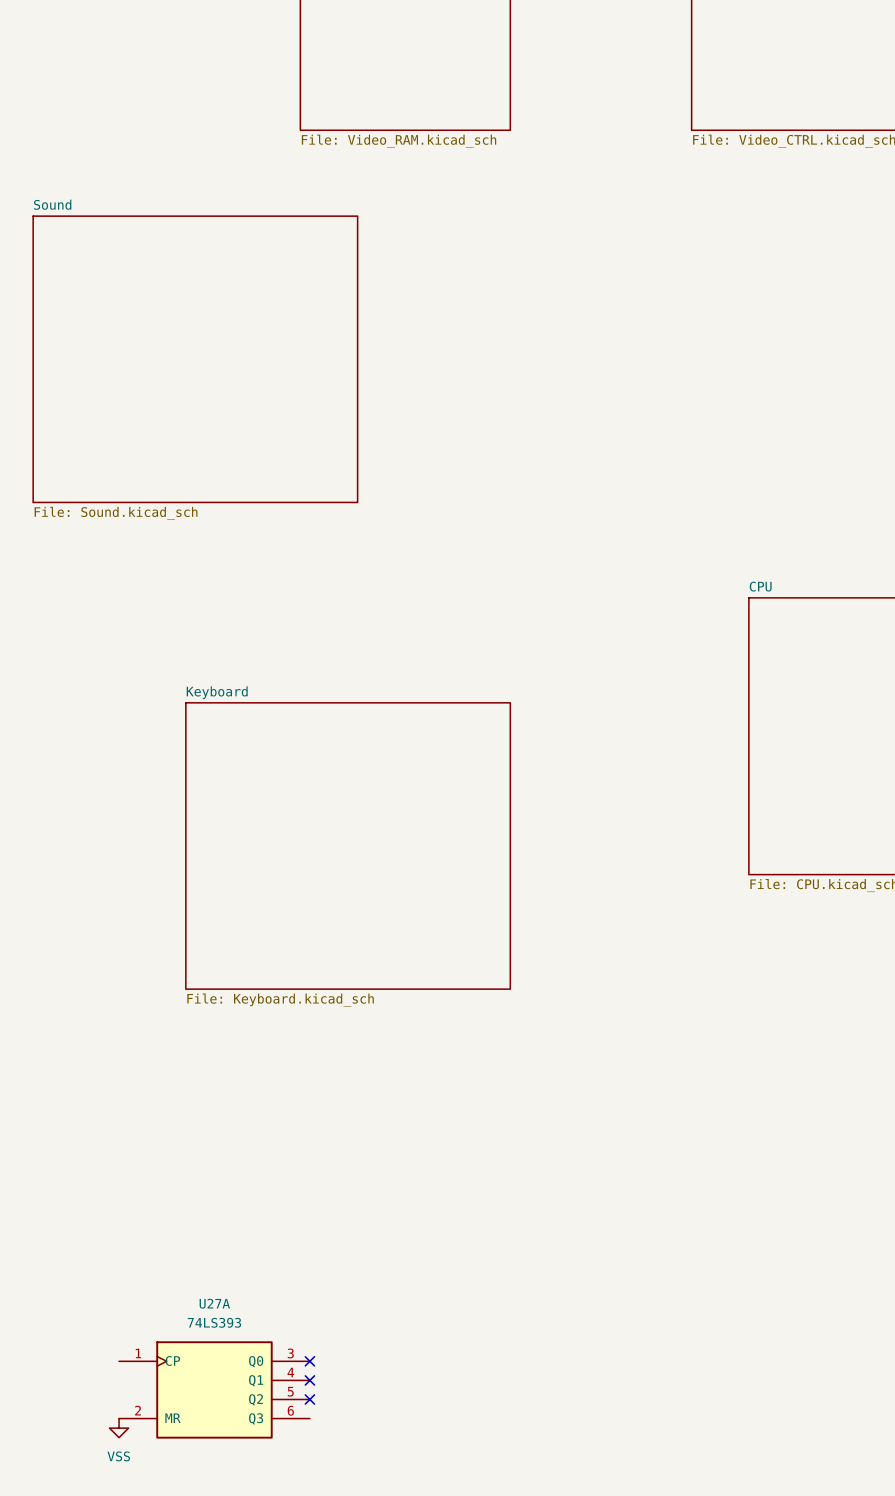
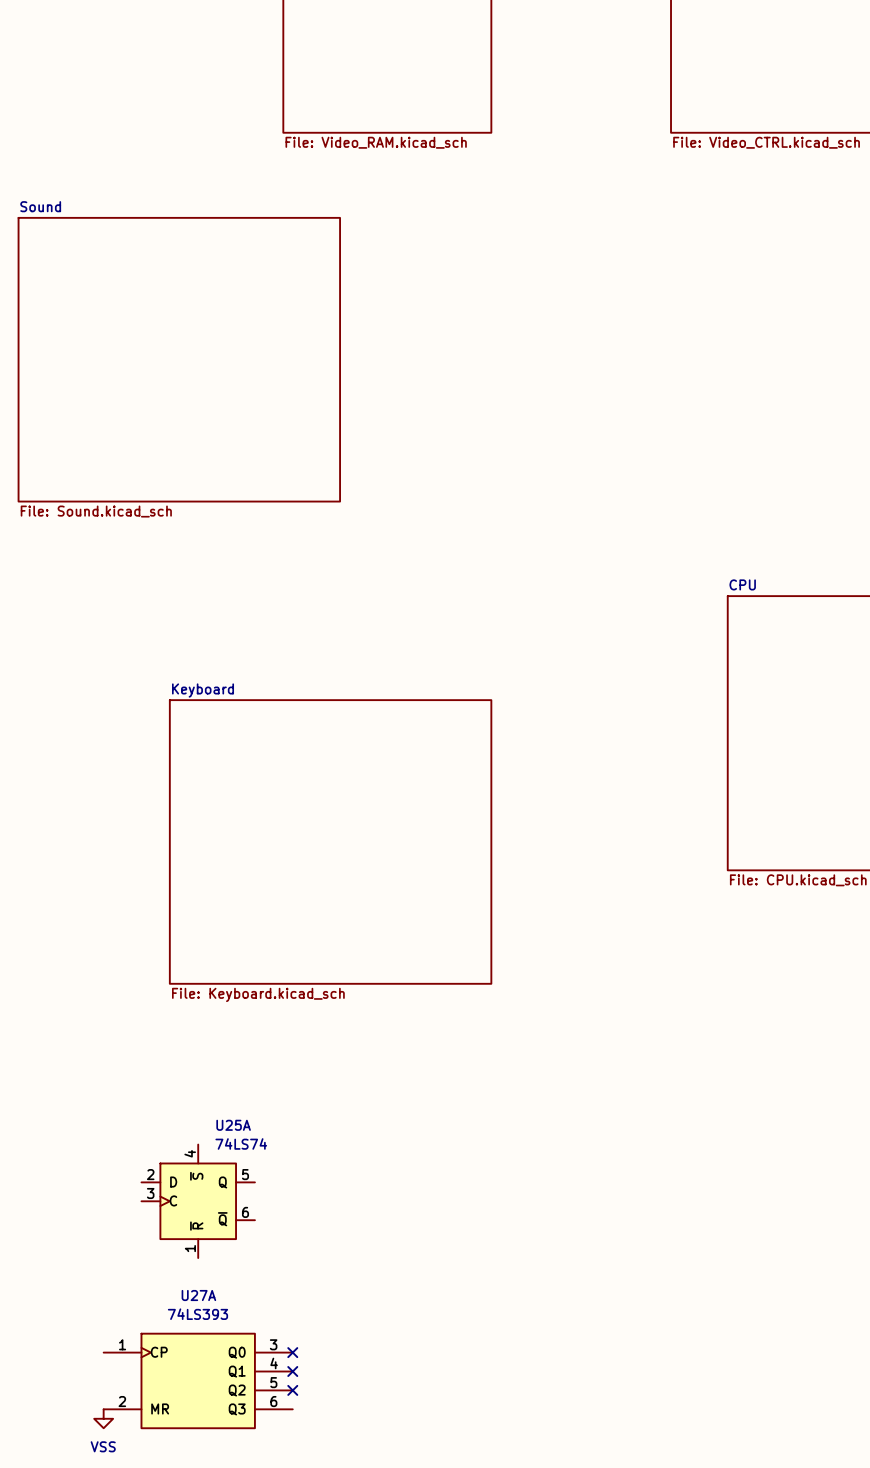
U25A: none -> 74LS74 (198, 1201)

